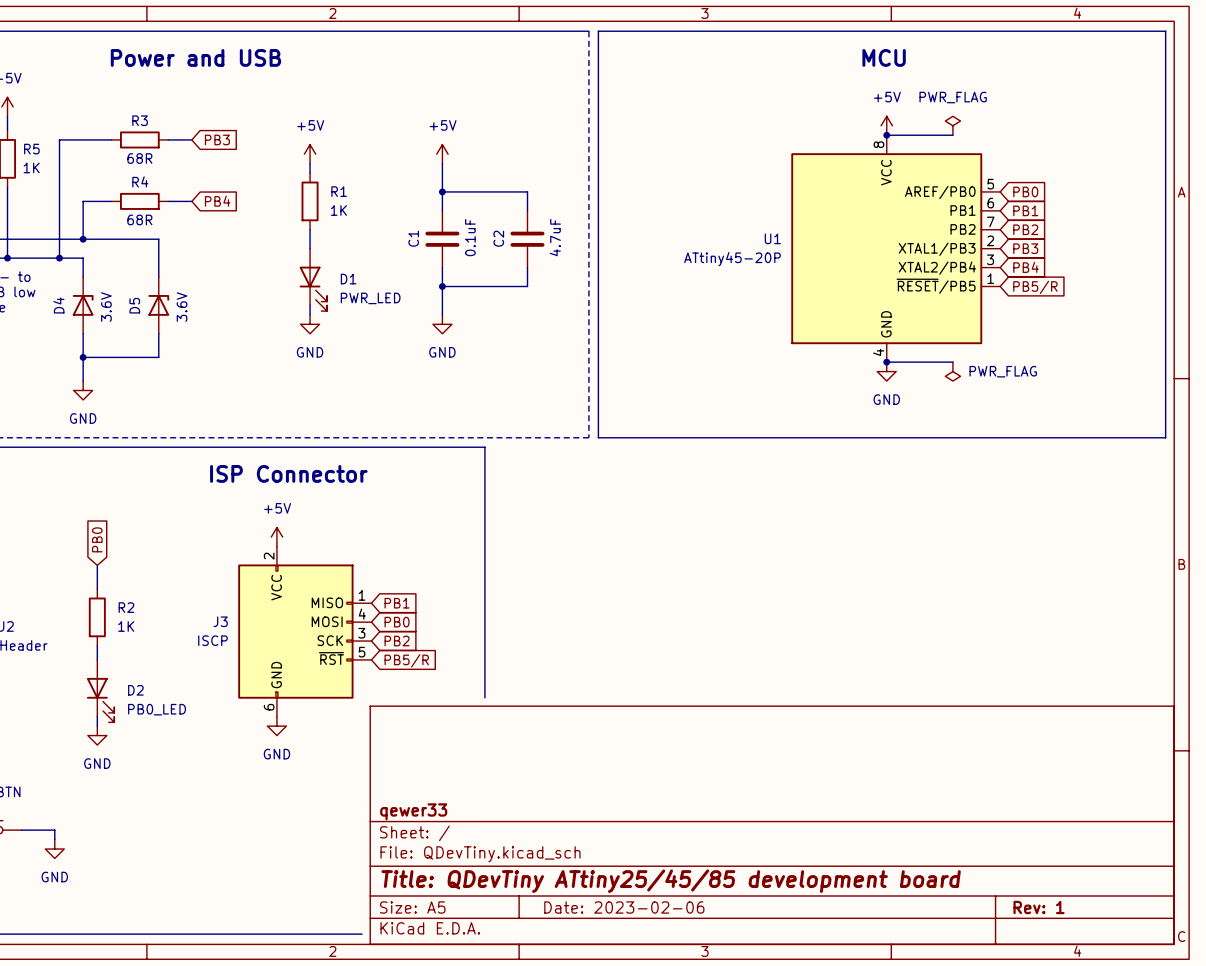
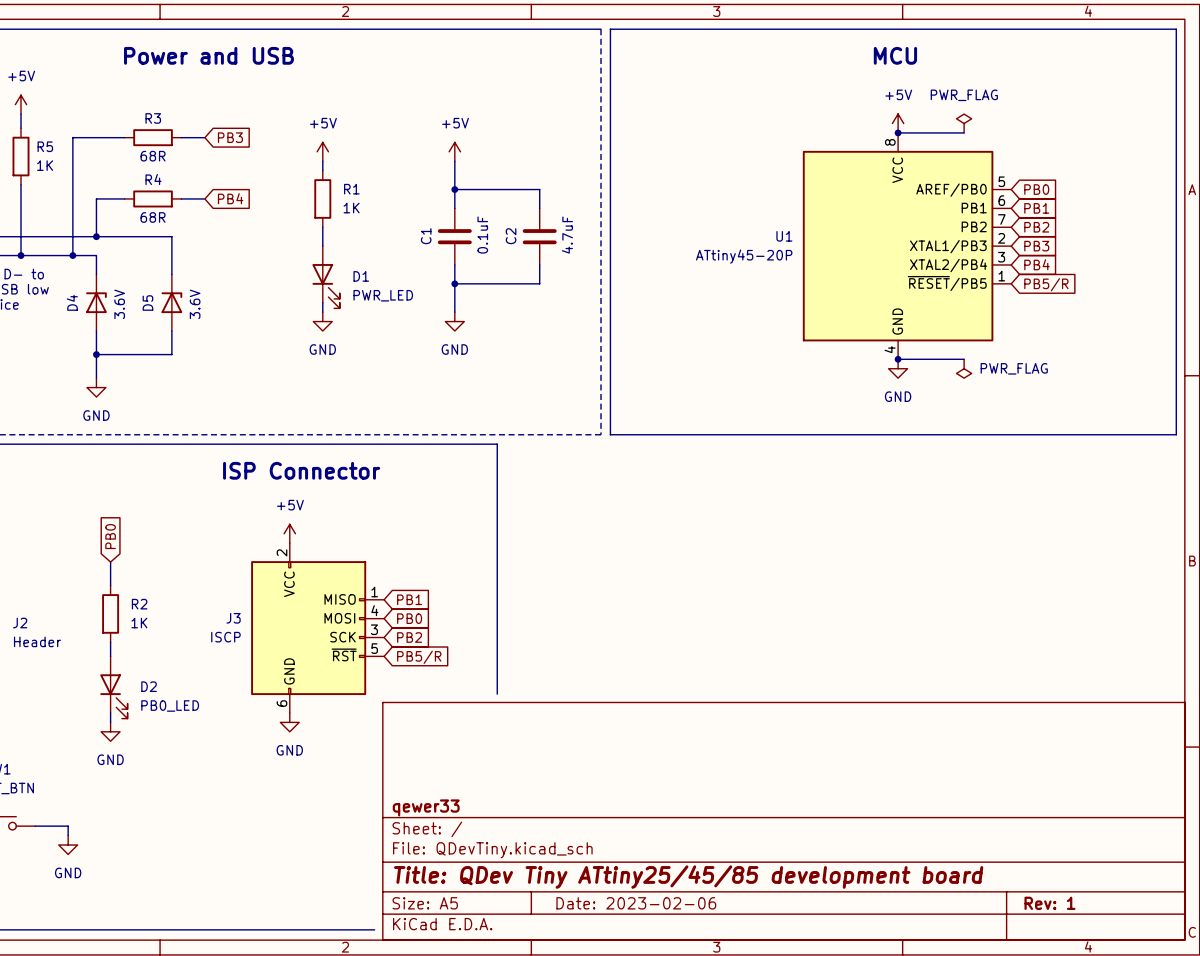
title block: Title: QDevTiny ATtiny25/45/85 development board (671, 881) -> Title: QDev Tiny ATtiny25/45/85 development board (688, 877)

